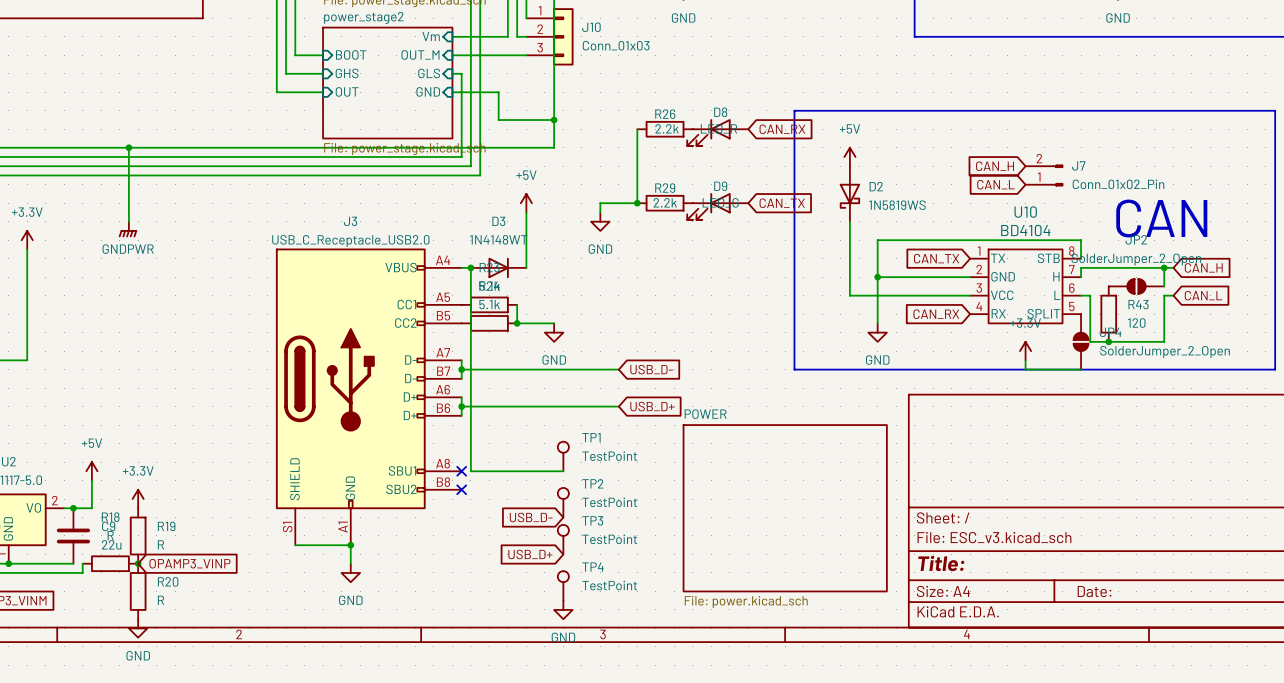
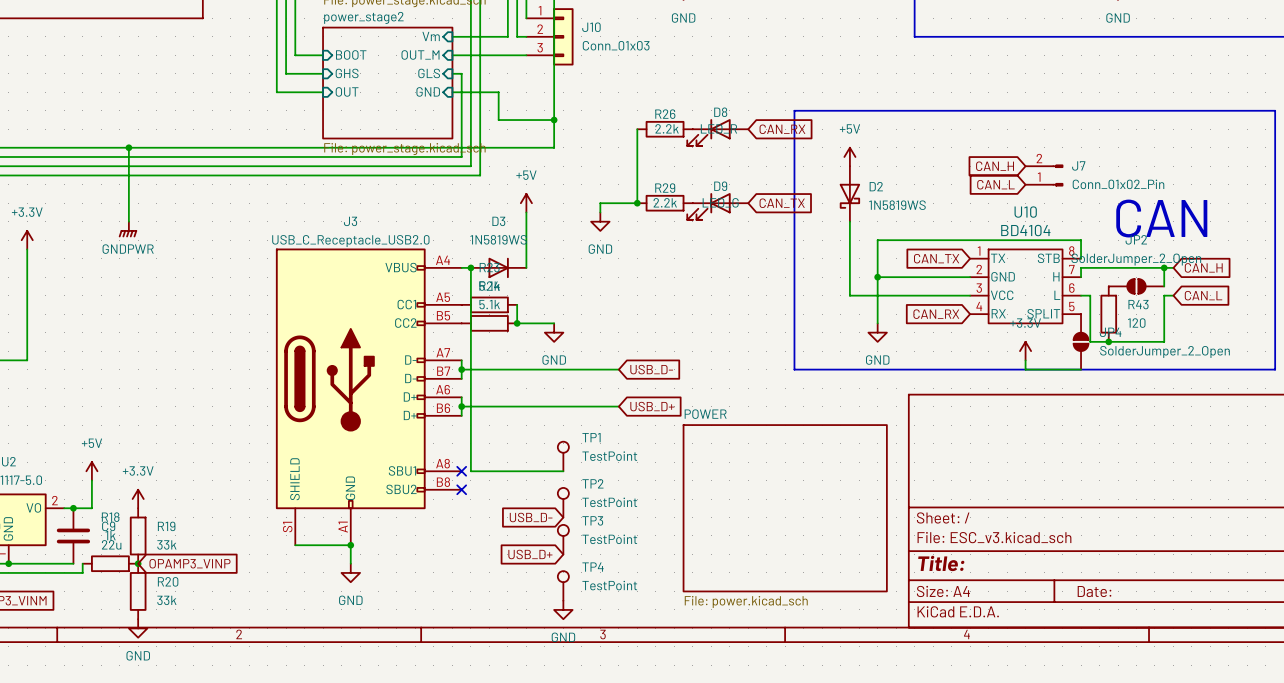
D3 value: 1N4148WT (498, 239) -> 1N5819WS (498, 239)
R18 value: R (110, 535) -> 1k (110, 535)
R19 value: R (160, 544) -> 33k (166, 544)
R20 value: R (160, 600) -> 33k (166, 600)

